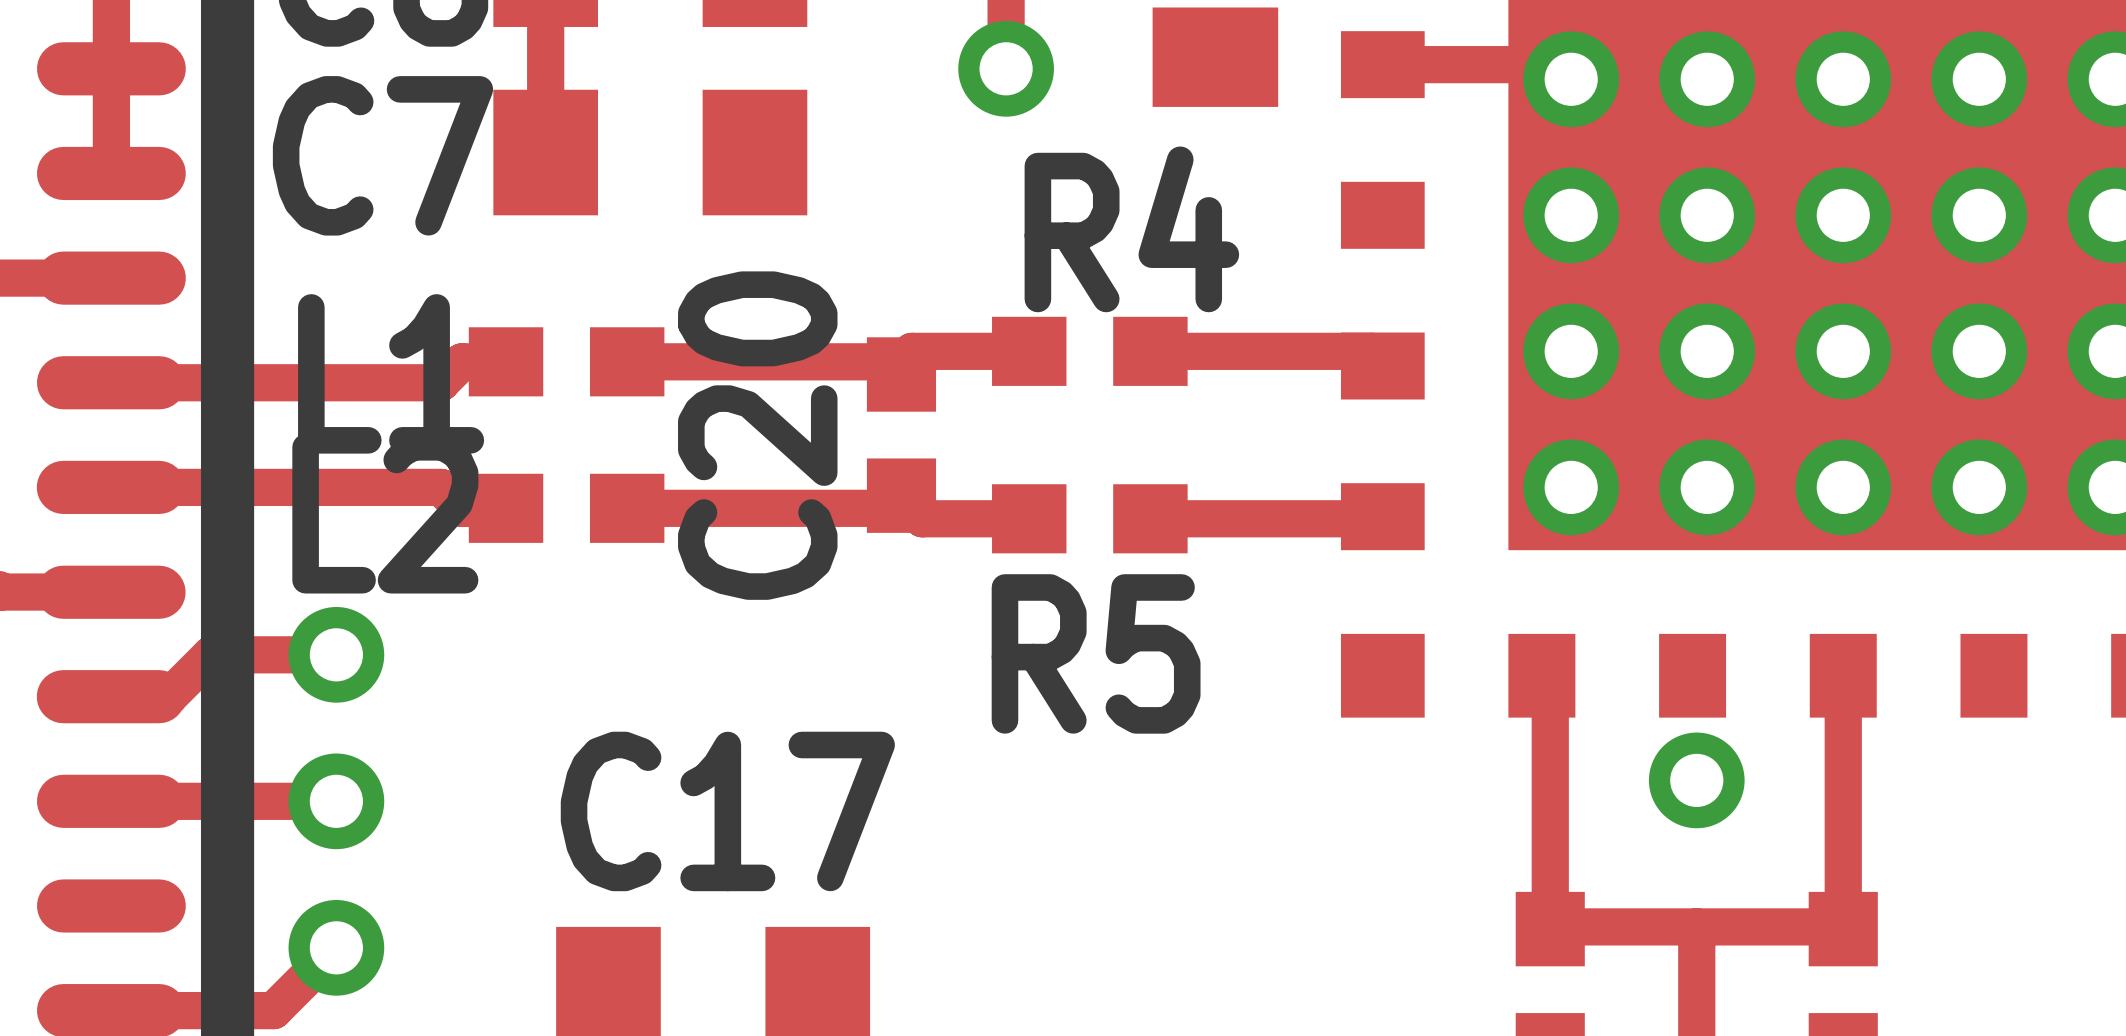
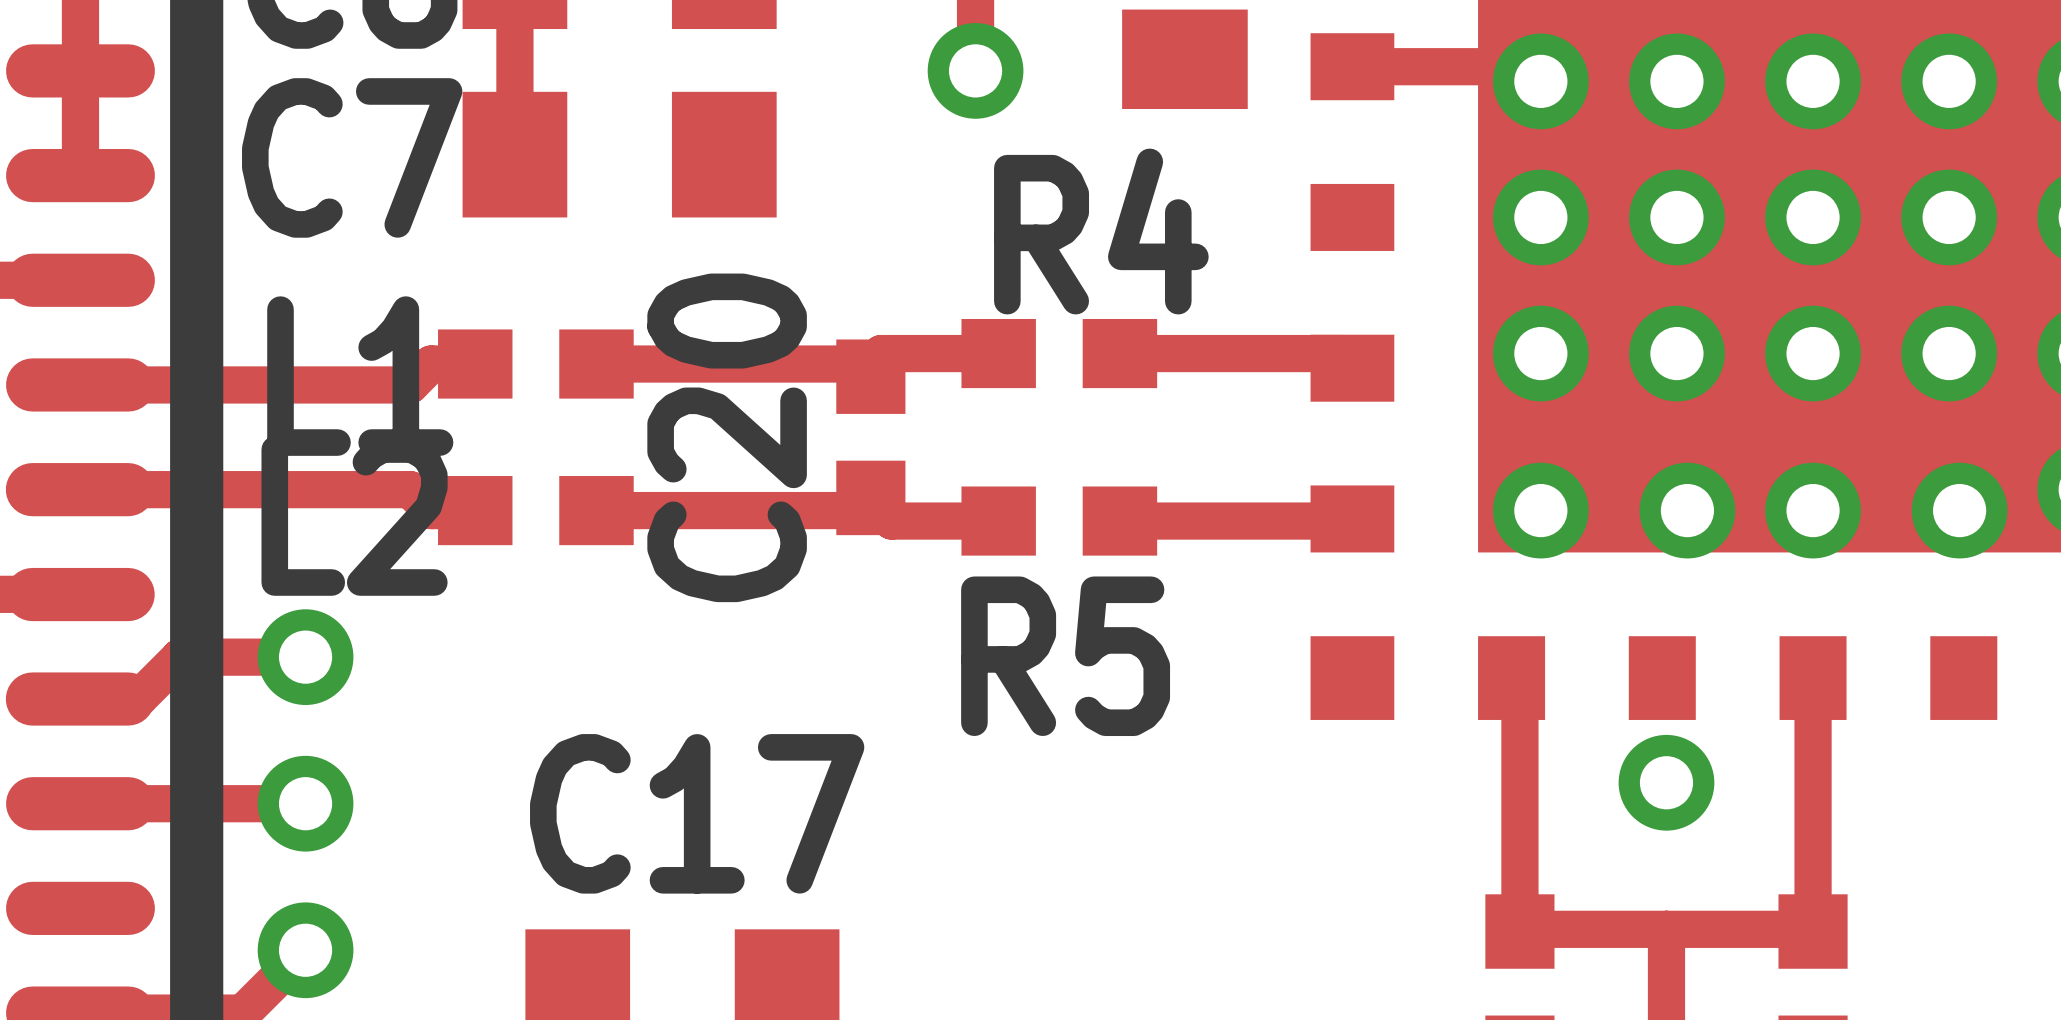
via position: (1571, 487) -> (1540, 510)
via position: (1707, 487) -> (1687, 510)
via position: (1843, 487) -> (1813, 510)
via position: (1979, 487) -> (1959, 510)

